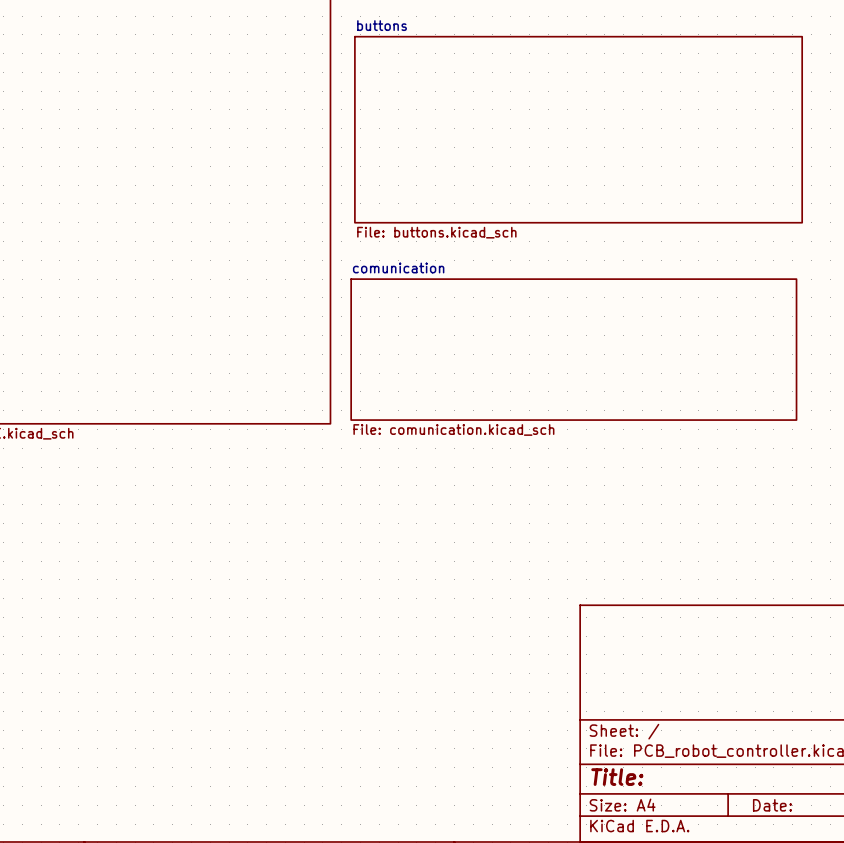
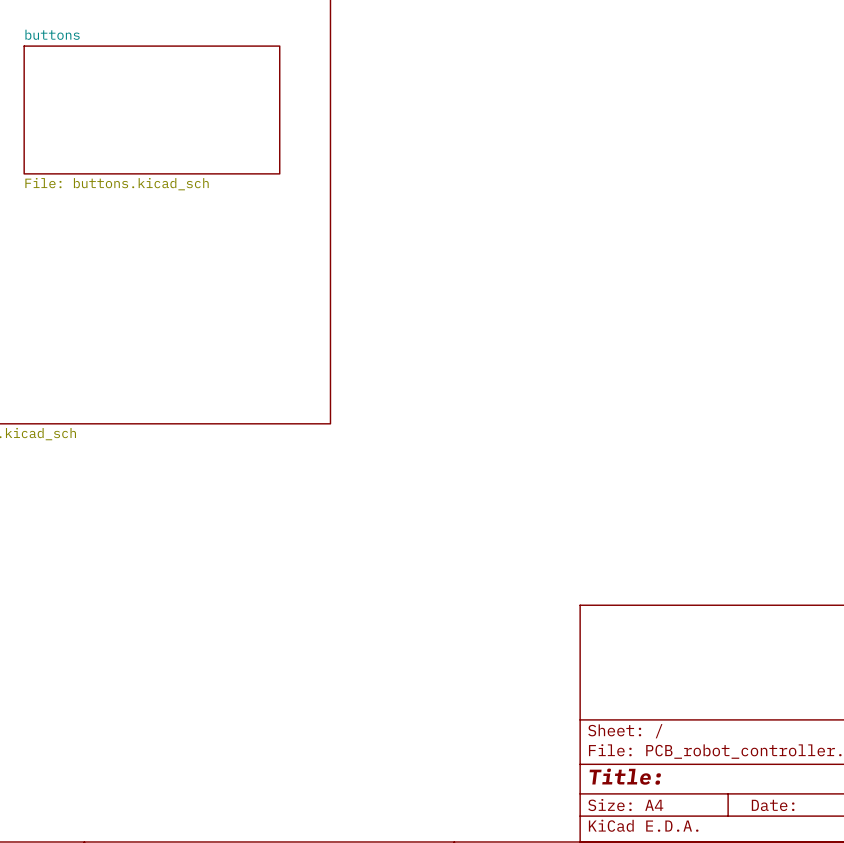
sheet buttons: none -> File: buttons.kicad_sch (151, 109)
sheet buttons: File: buttons.kicad_sch (578, 129) -> none
sheet comunication: File: comunication.kicad_sch (573, 349) -> none

